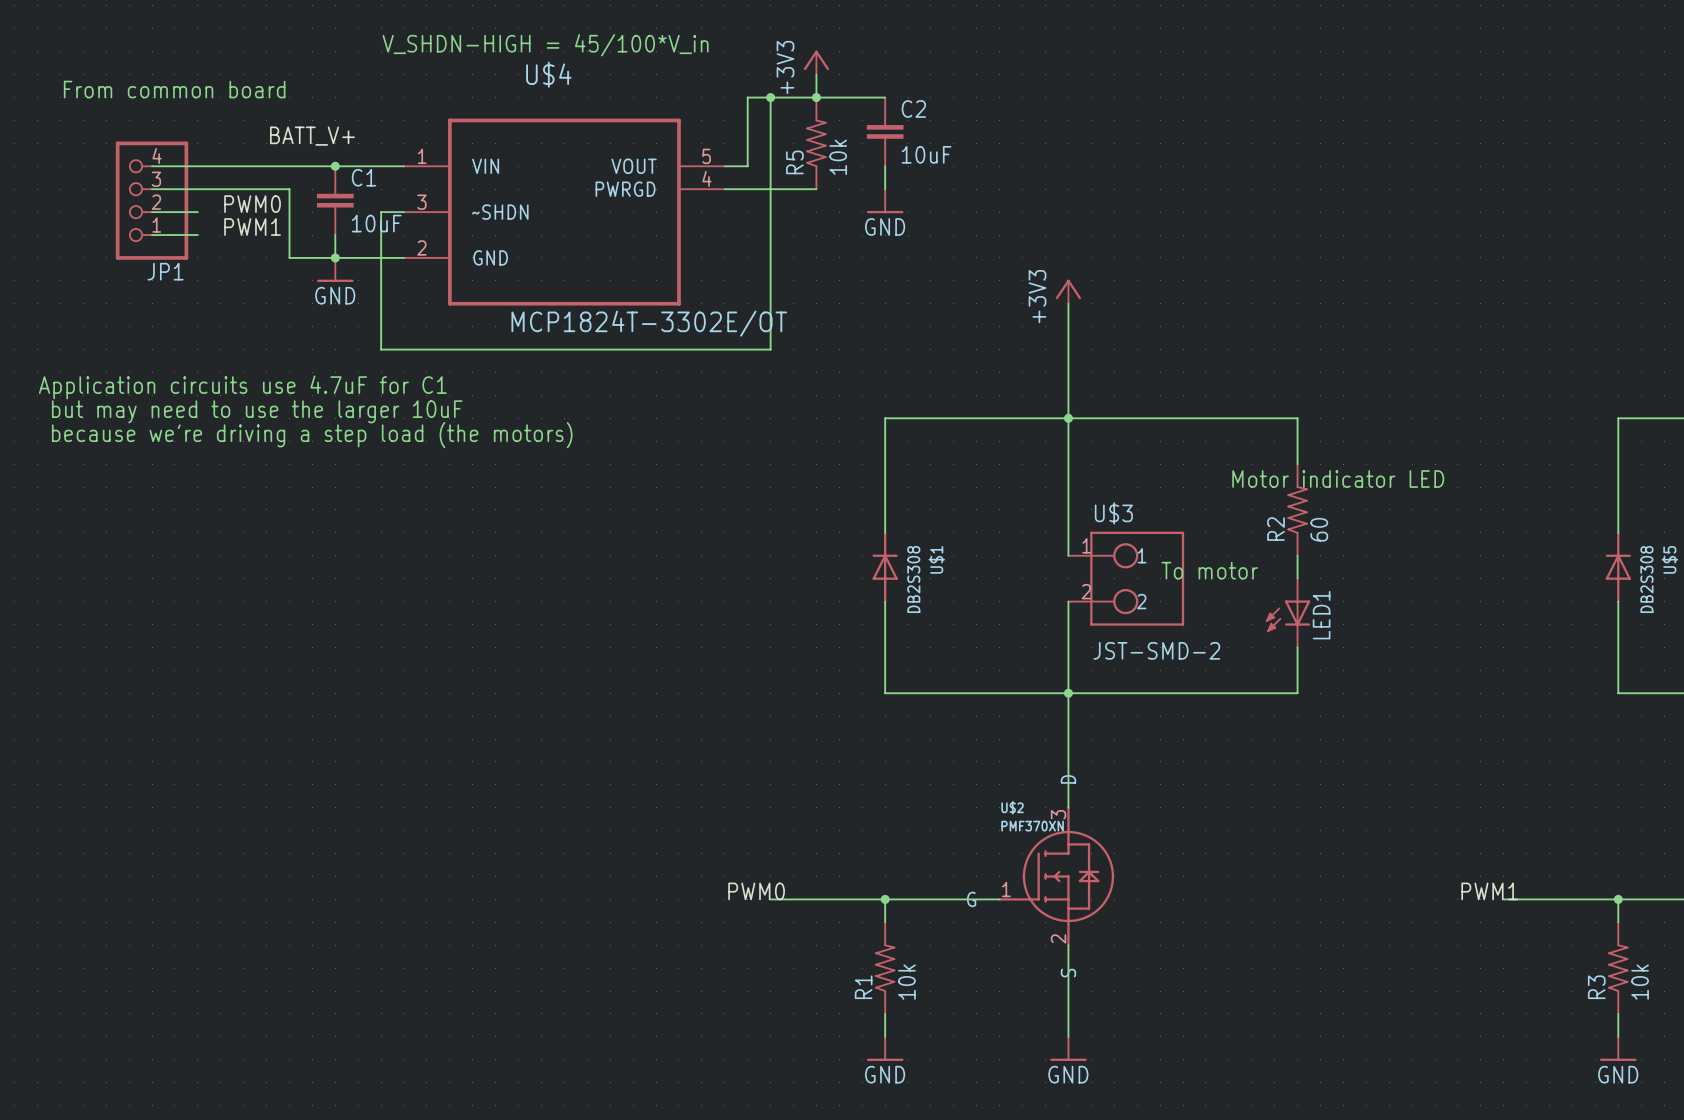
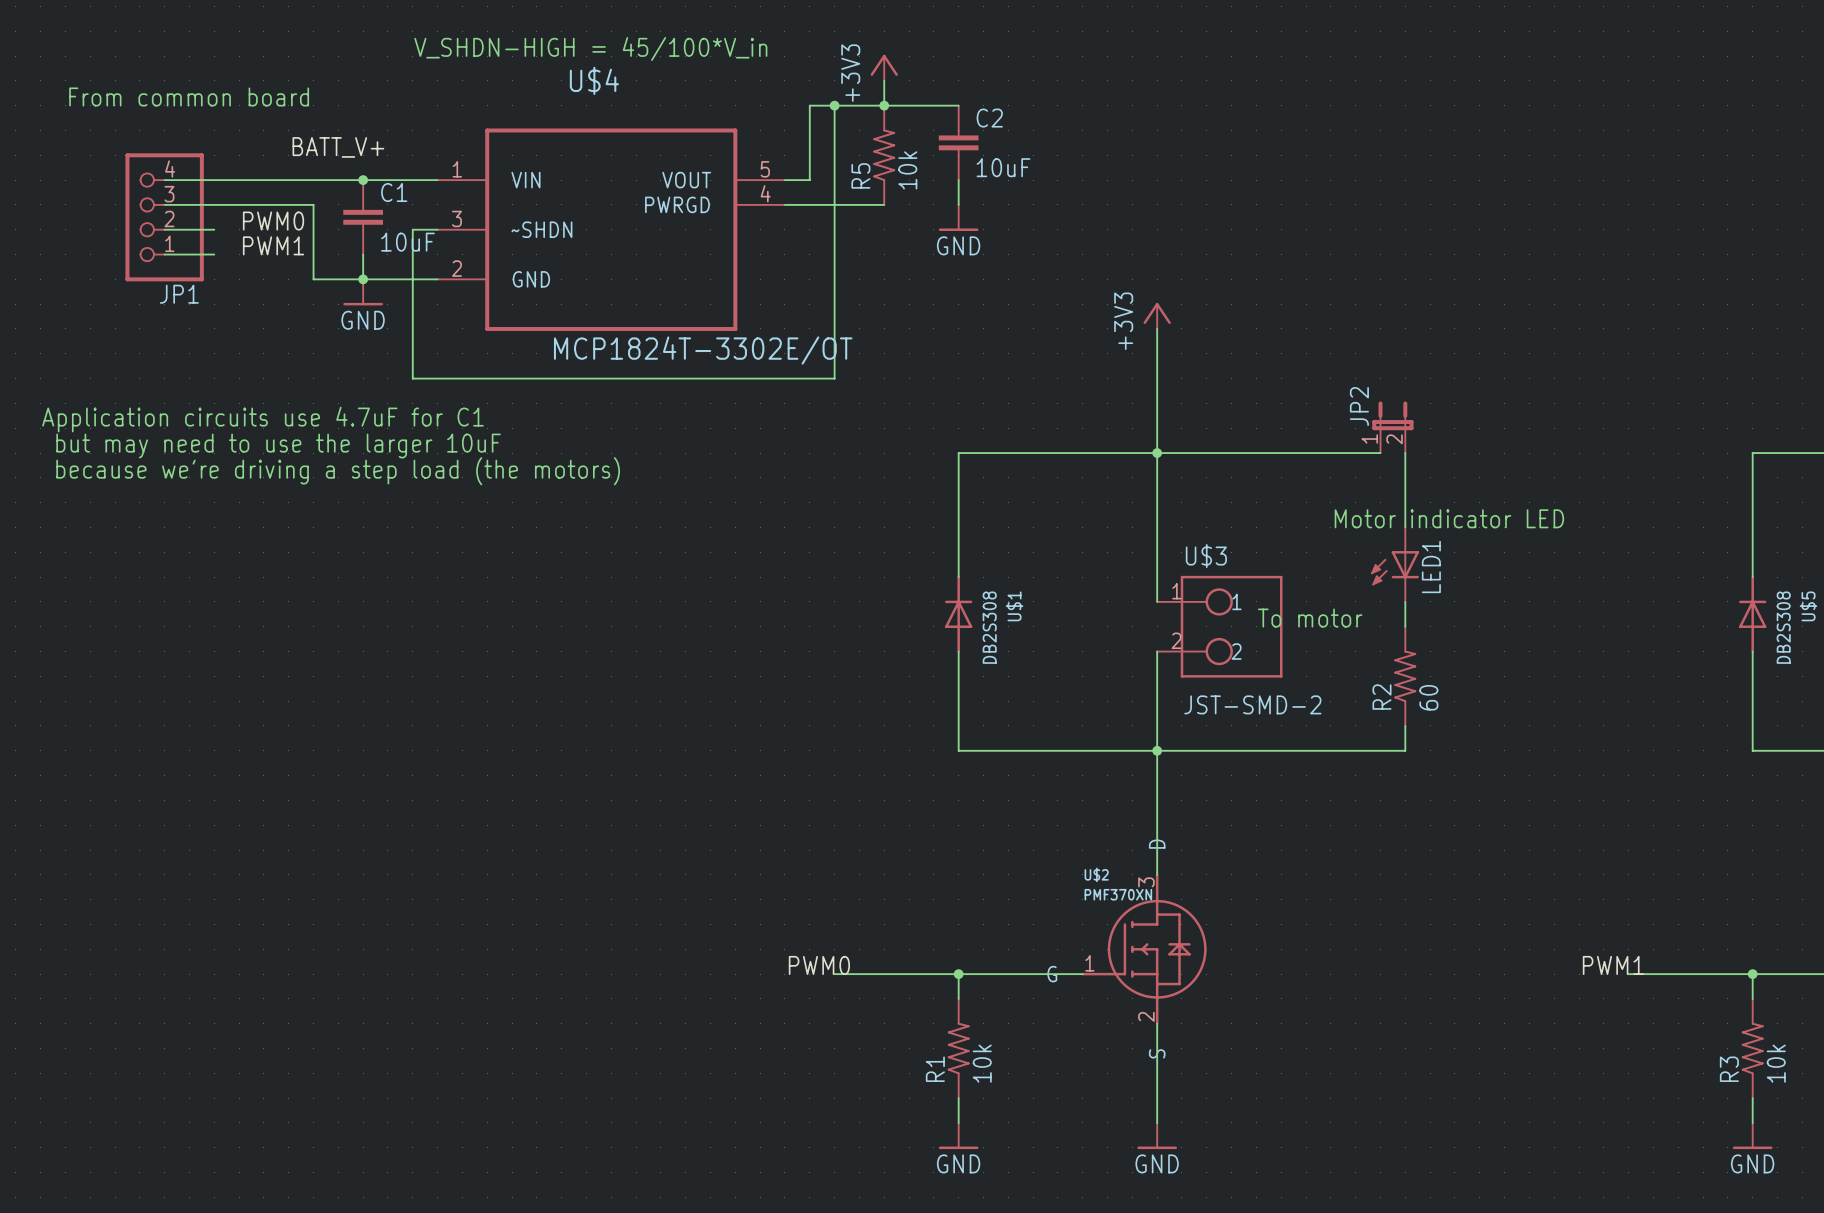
JP2: none -> (1392, 427)
wire: (1274, 418) (1297, 418) -> none
R2 position: (1297, 509) -> (1405, 676)
LED1 position: (1288, 613) -> (1395, 564)

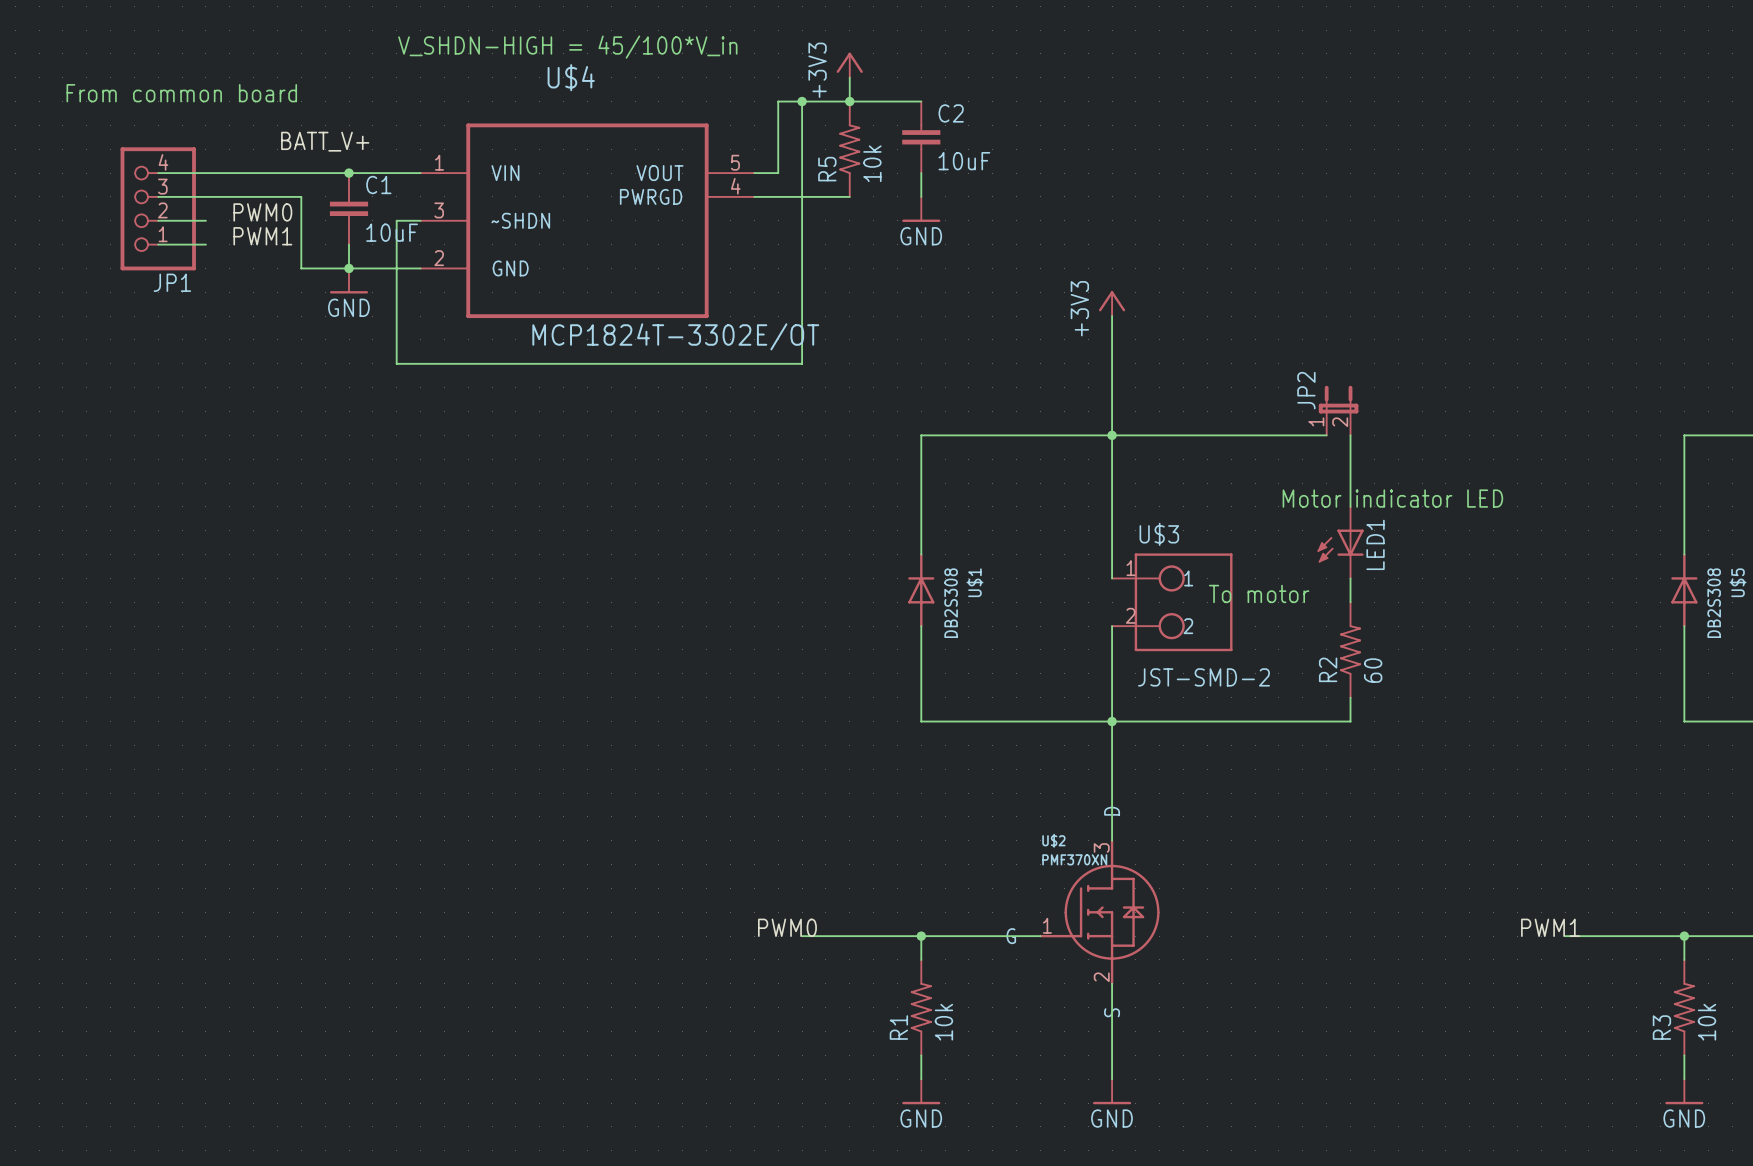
text: Application circuits use 4.7uF for C1 (262, 419) -> none
text: but may need to use the larger 10uF (278, 446) -> none
text: because we're driving a step load (the motors) (338, 471) -> none

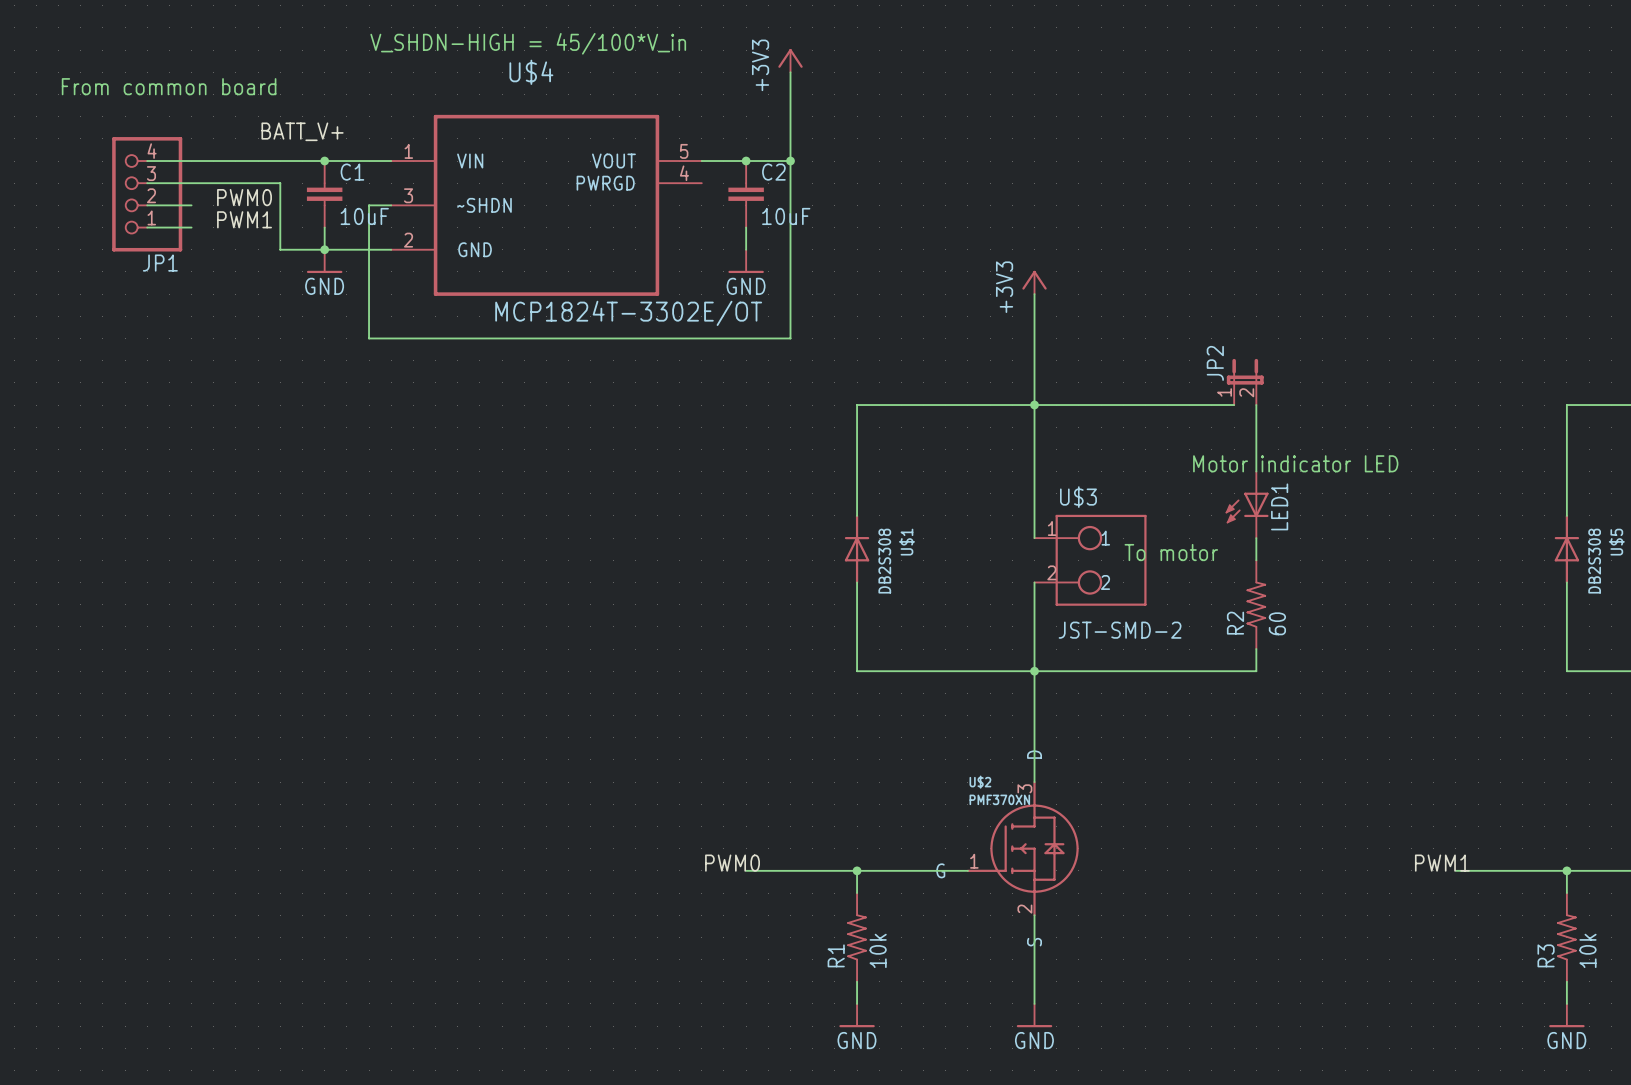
wire: (802, 101) (802, 244) -> none
junction: (802, 101) -> none
junction: (849, 101) -> none
wire: (921, 101) (778, 101) (778, 173) -> (790, 161) (723, 161)
C2 position: (921, 137) -> (746, 194)
R5: 10k (849, 149) -> none
junction: none -> (746, 161)
junction: none -> (790, 161)
wire: (921, 173) (921, 196) -> none
wire: (754, 196) (849, 196) -> none
power symbol position: GND (921, 209) -> GND (746, 261)
wire: (802, 268) (802, 363) -> (790, 94) (790, 338) (746, 338)

